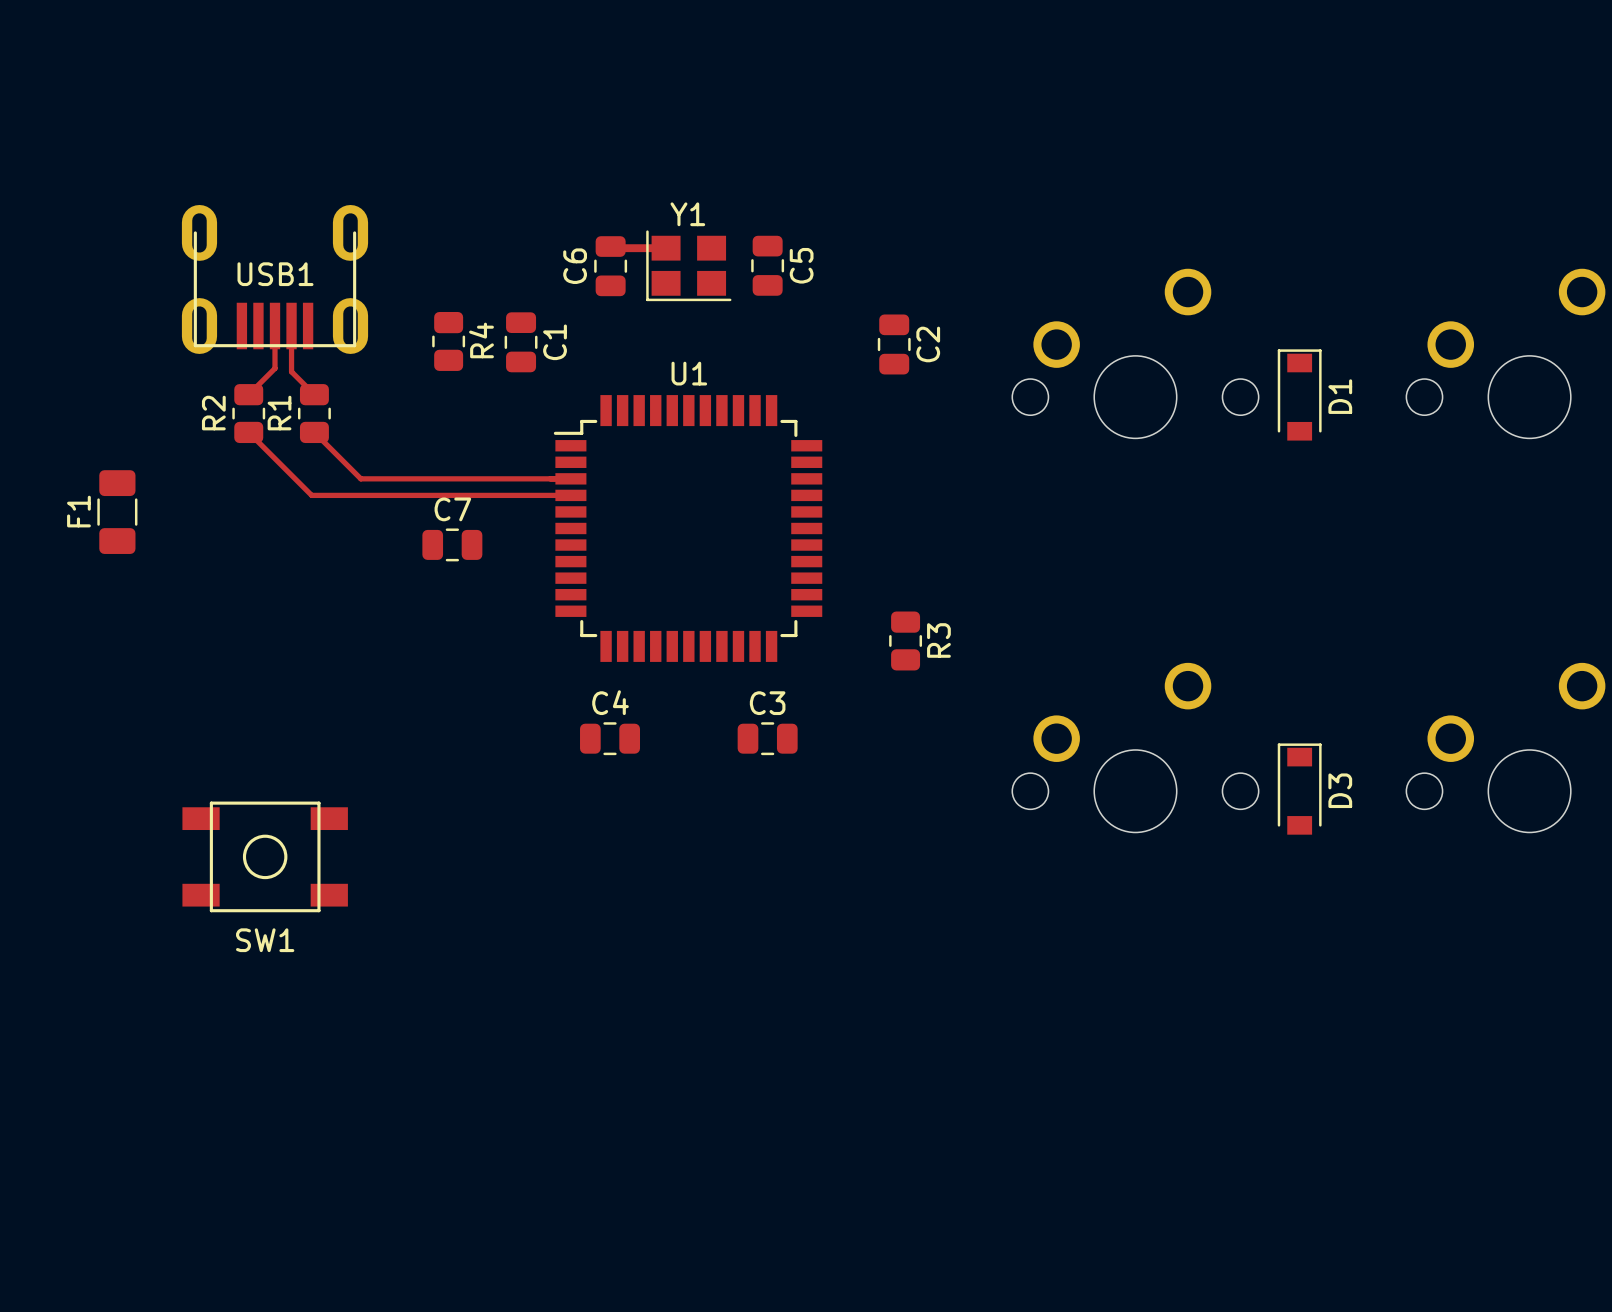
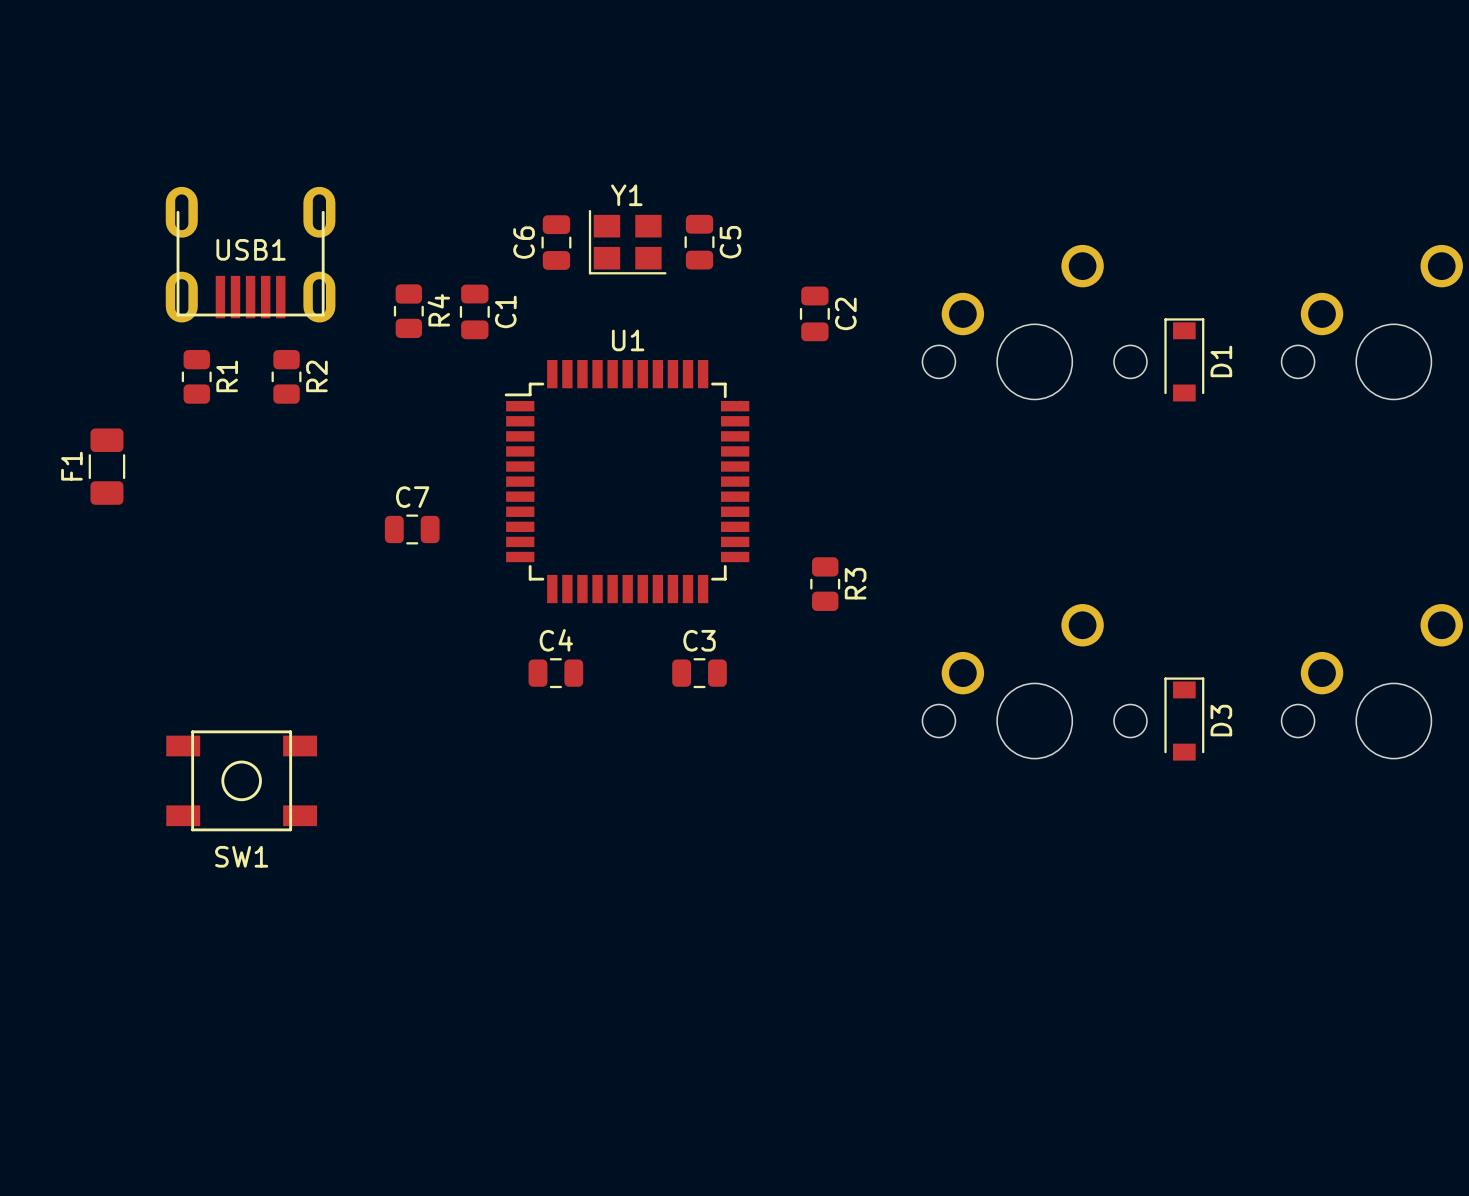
top track: (610, 246) (612, 248) (666, 248) -> none
top track: (274, 326) (274, 368) (248, 394) -> none
top track: (291, 326) (291, 371) (314, 394) -> none
R1: none -> (196, 376)
R2: (248, 413) -> none
R1 name: R1 (279, 413) -> R2 (316, 376)
top track: (248, 432) (311, 495) (570, 495) -> none
top track: (314, 432) (360, 478) (570, 479) -> none
C7 position: (452, 544) -> (412, 529)

